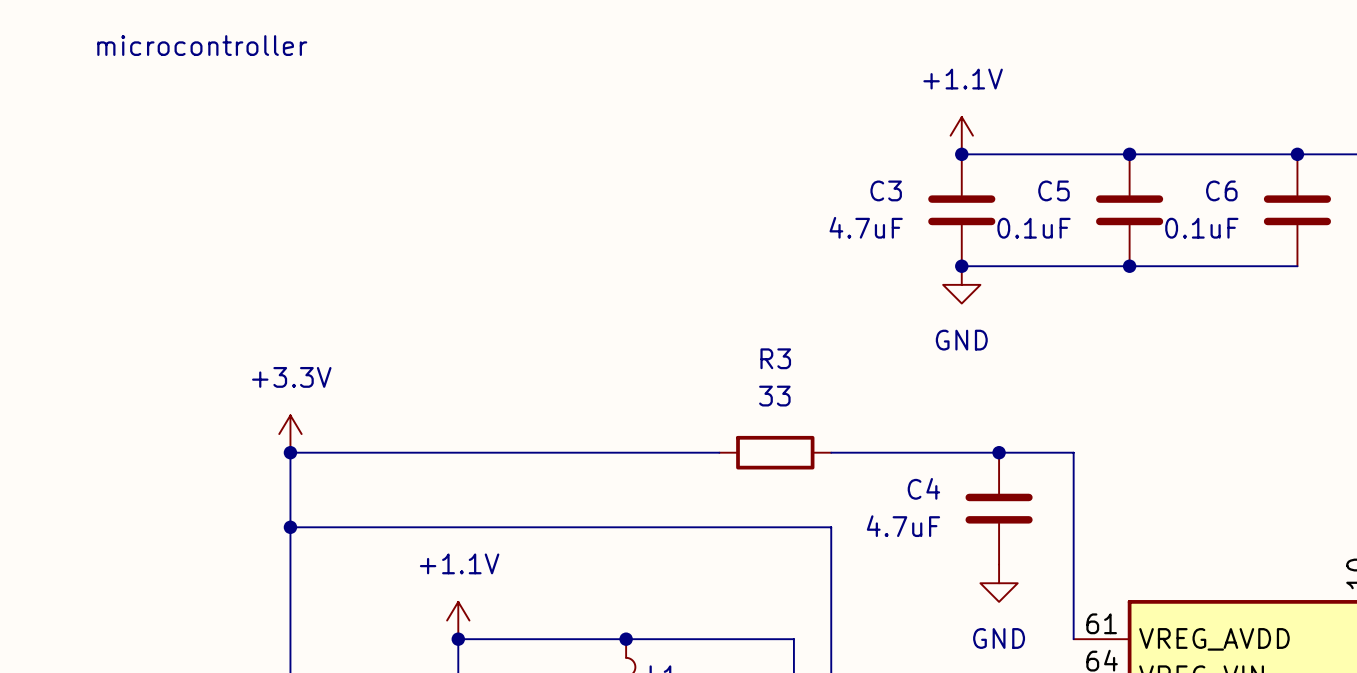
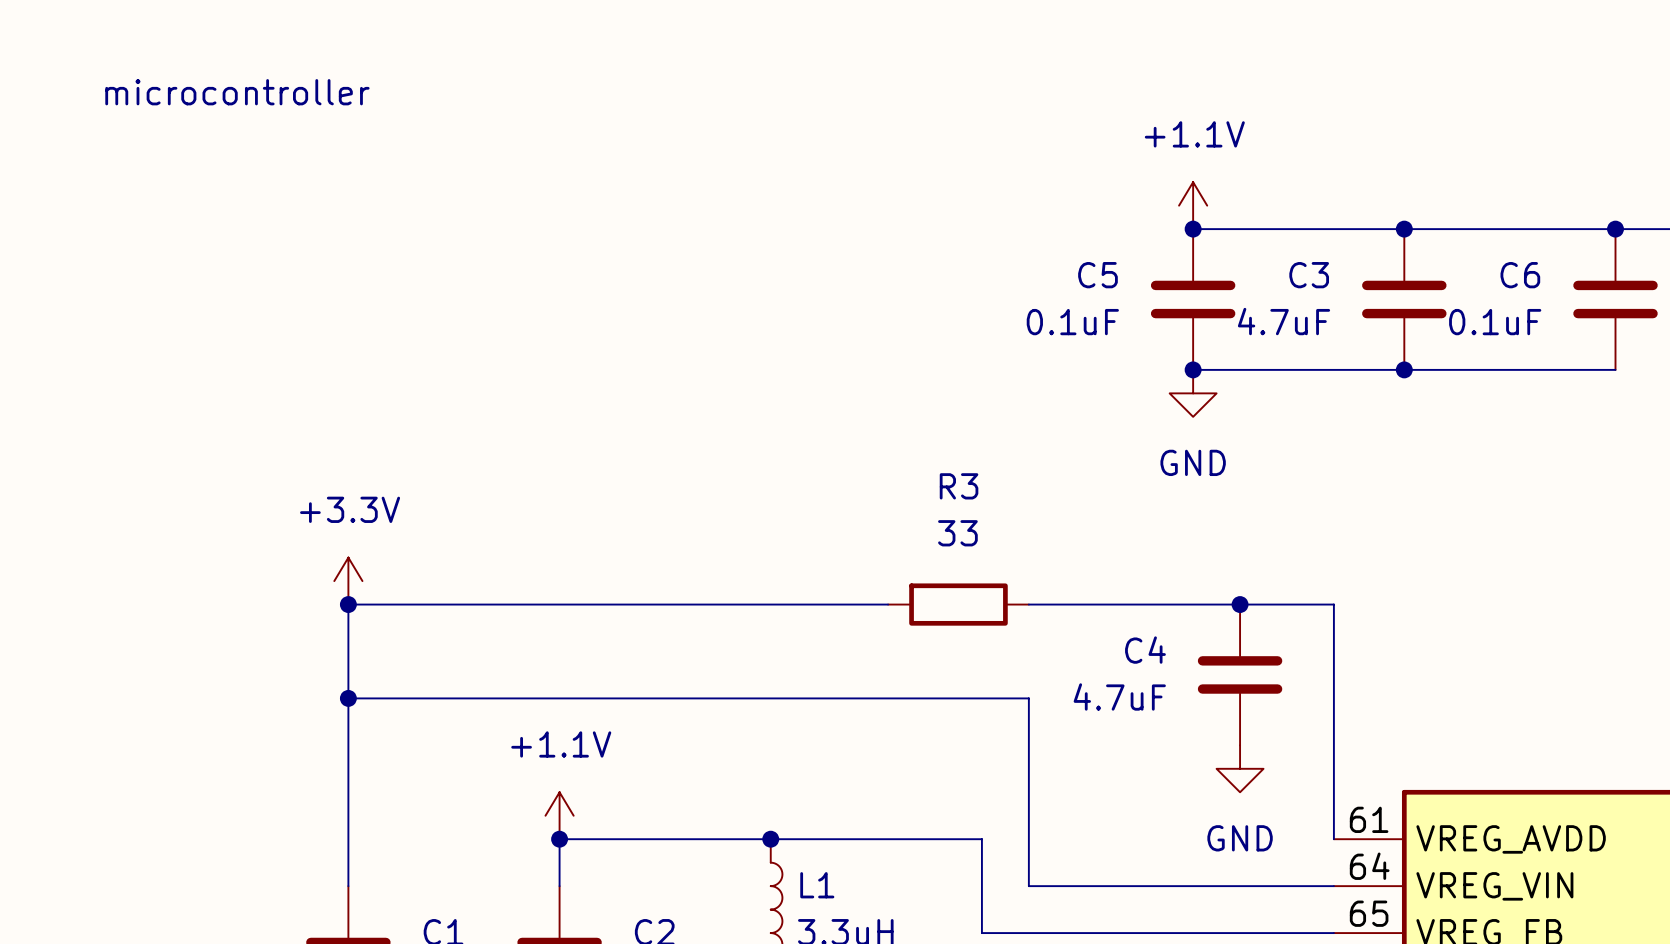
C3 name: C3 (886, 190) -> C5 (1097, 275)
C5 name: C5 (1053, 190) -> C3 (1309, 275)
C3 value: 4.7uF (866, 227) -> 0.1uF (1072, 322)
C5 value: 0.1uF (1034, 228) -> 4.7uF (1284, 321)

